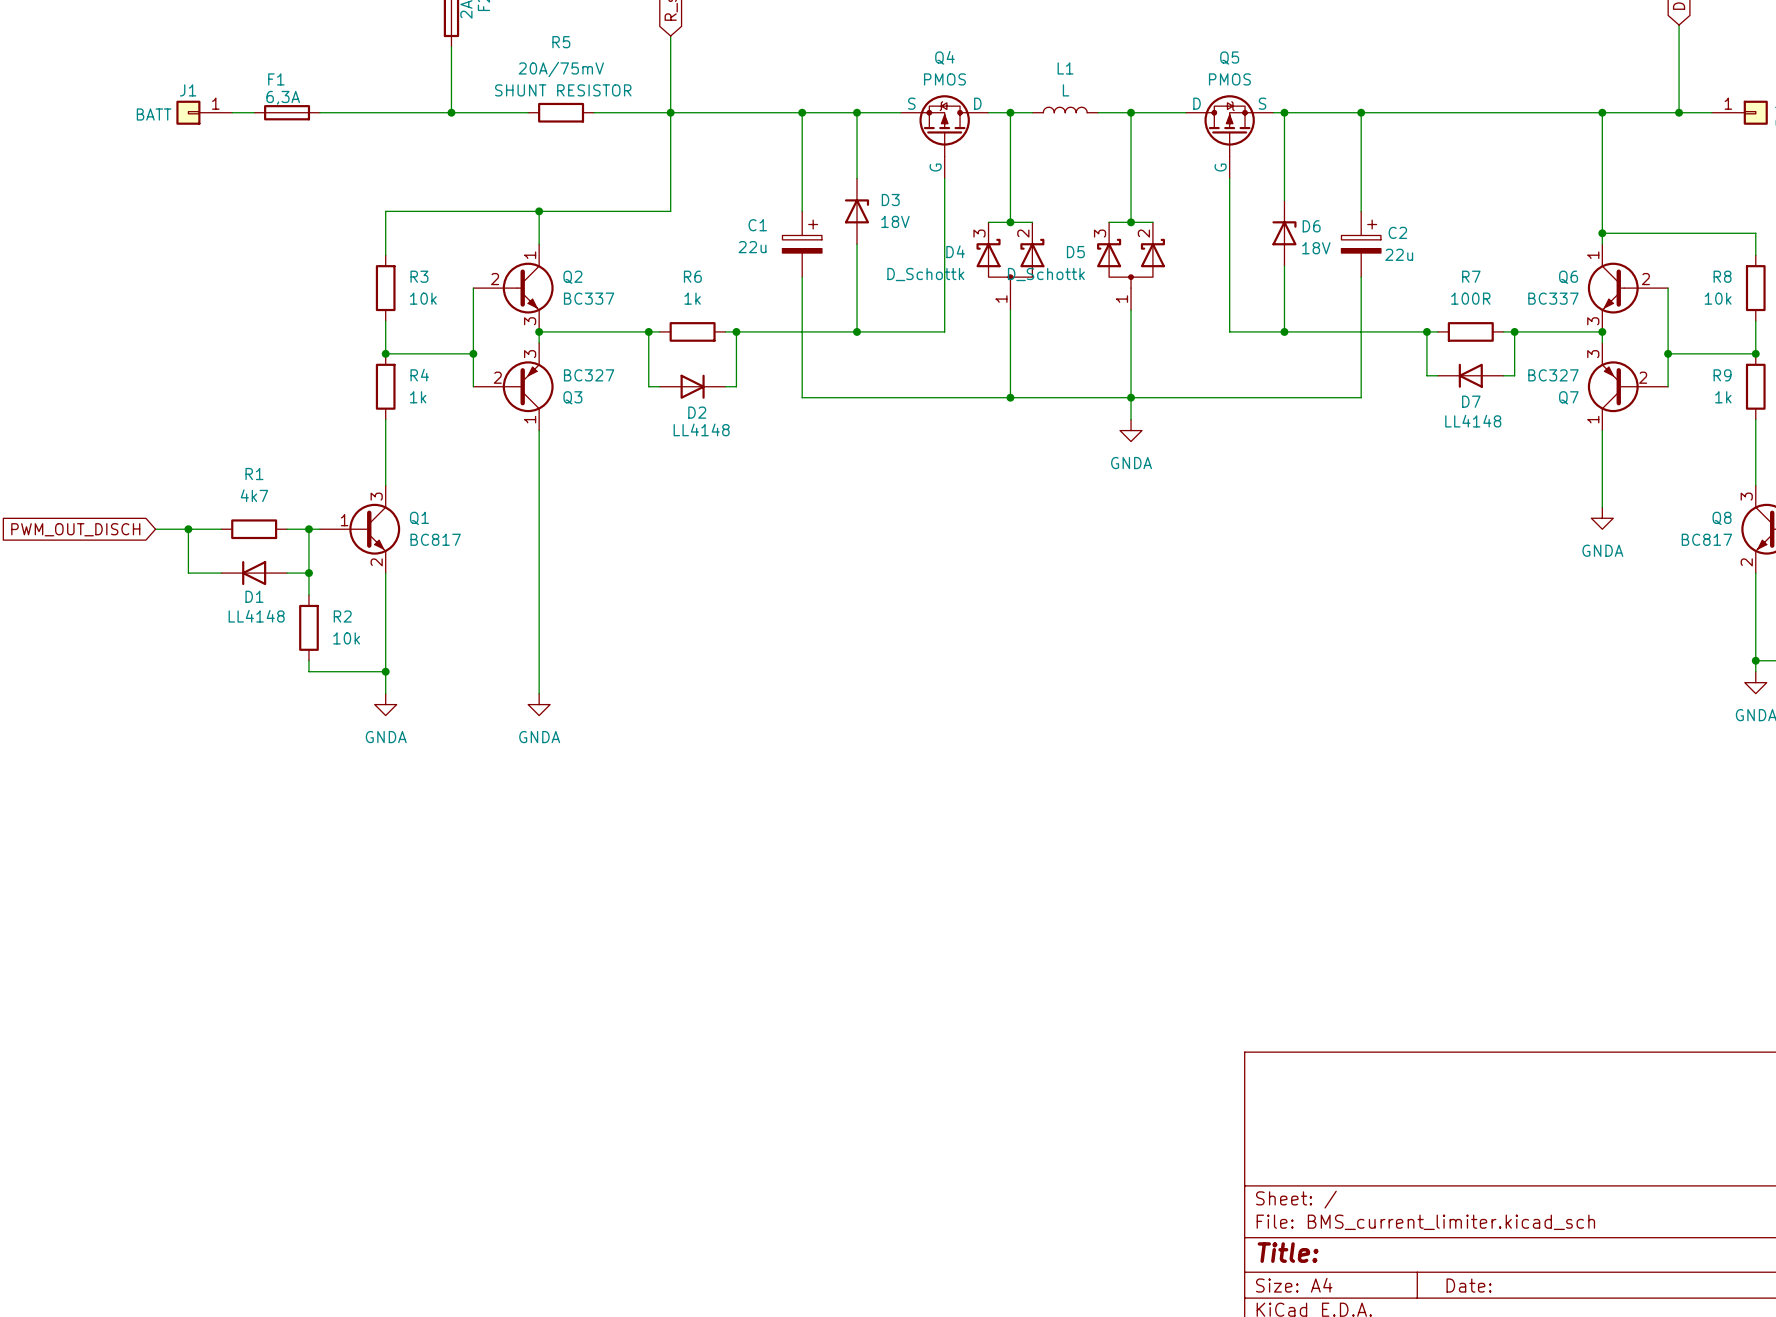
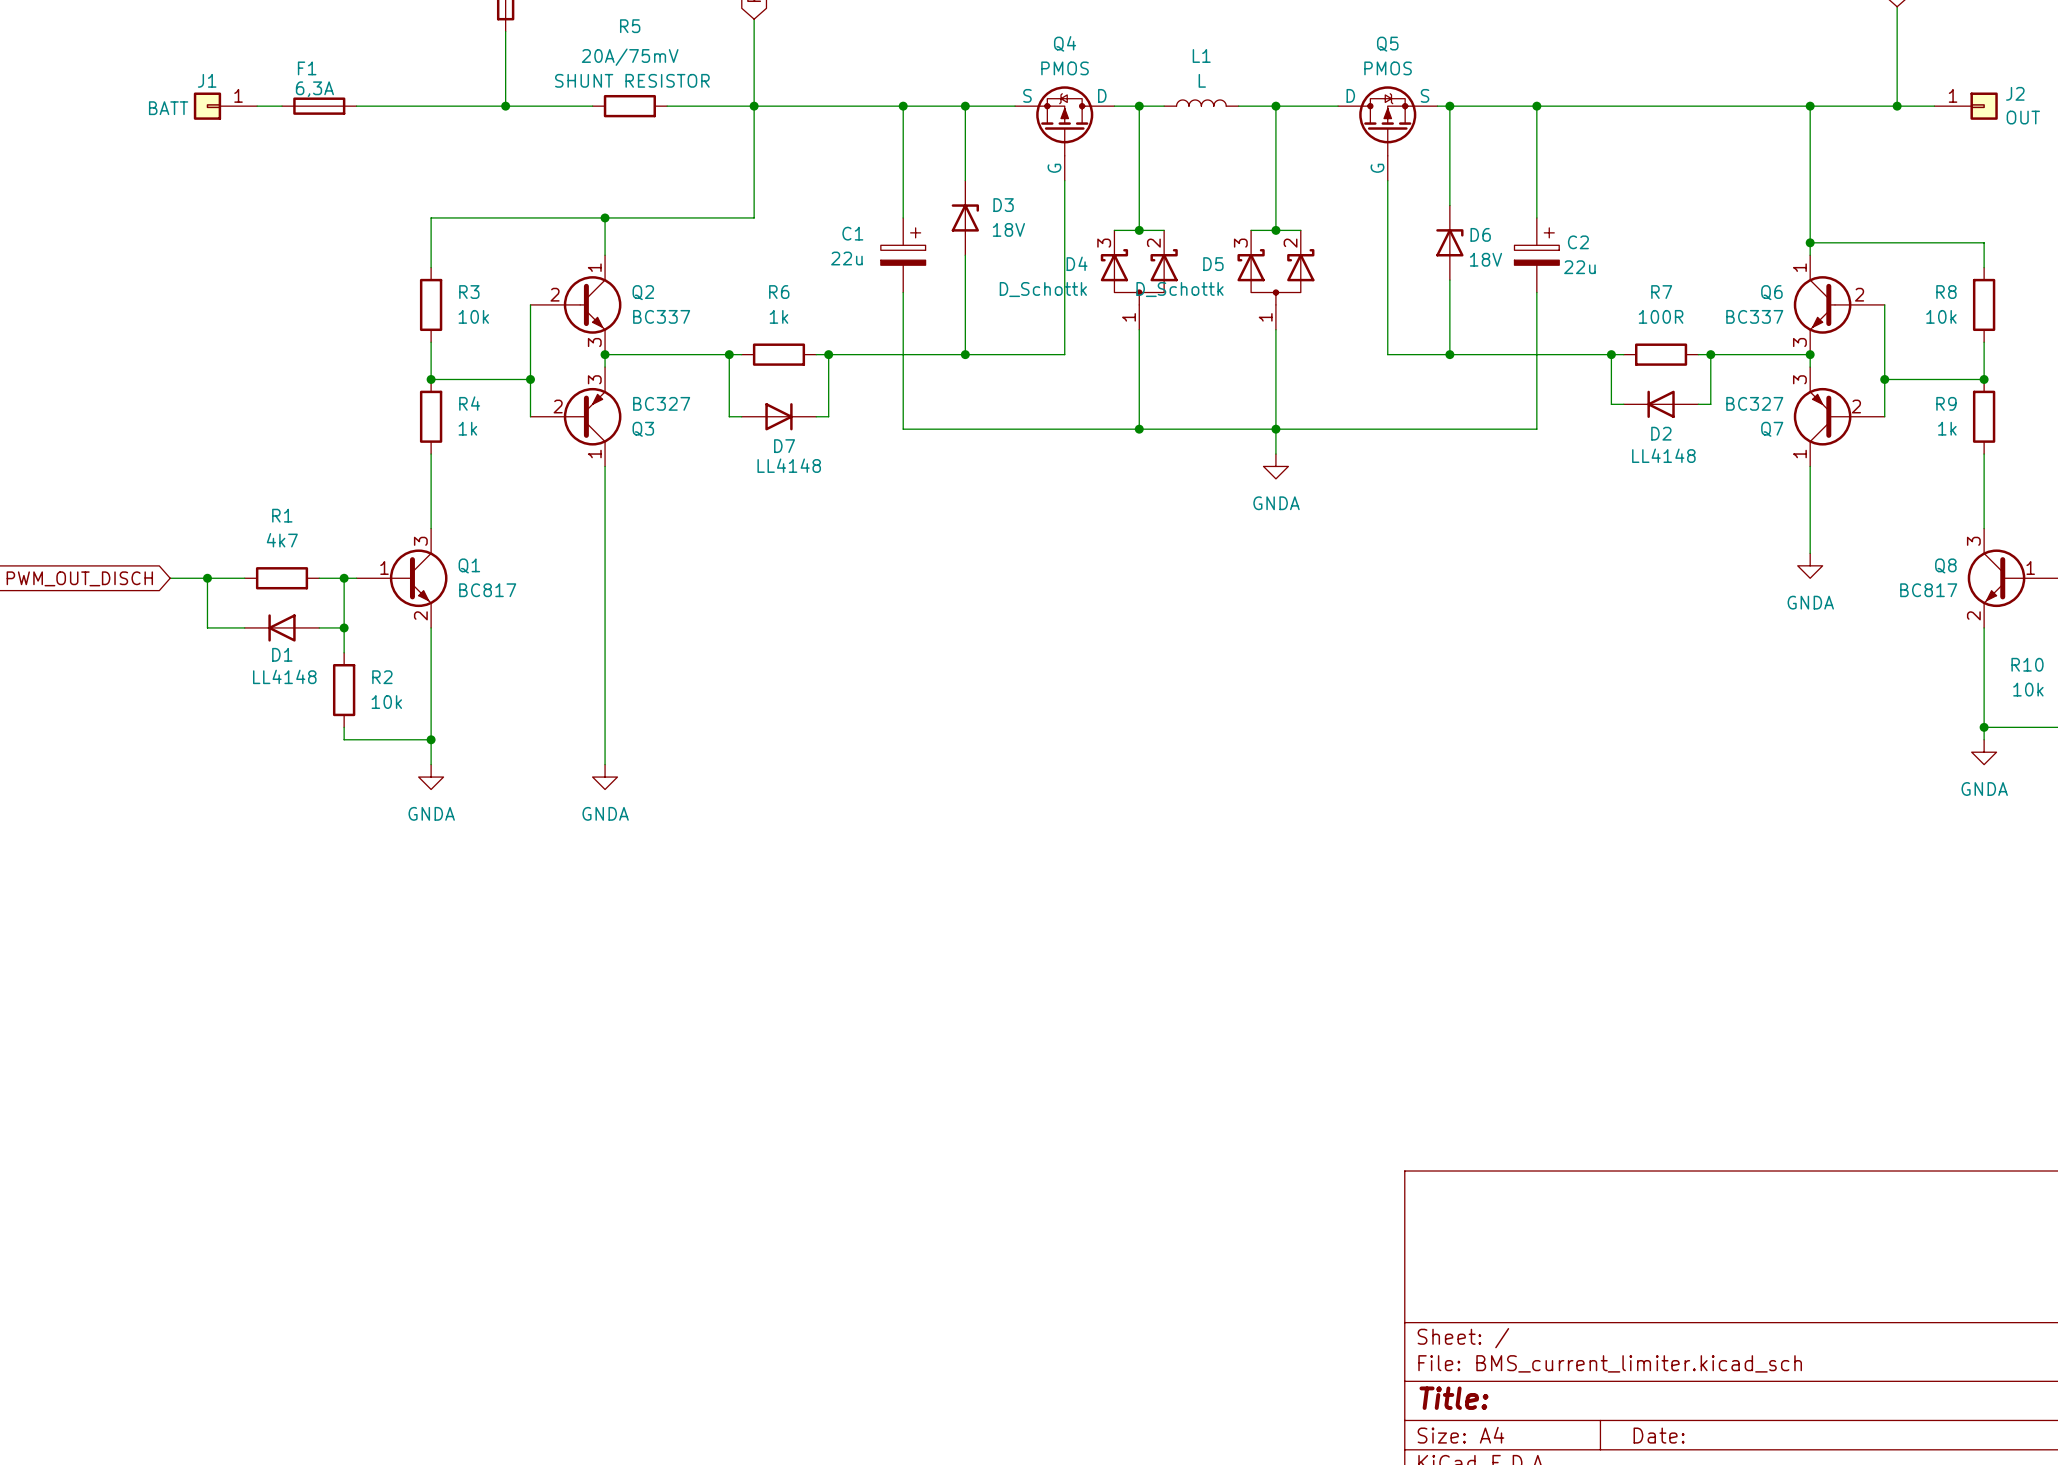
D7 name: D7 (1471, 401) -> D2 (1661, 433)
D2 name: D2 (697, 412) -> D7 (784, 446)

